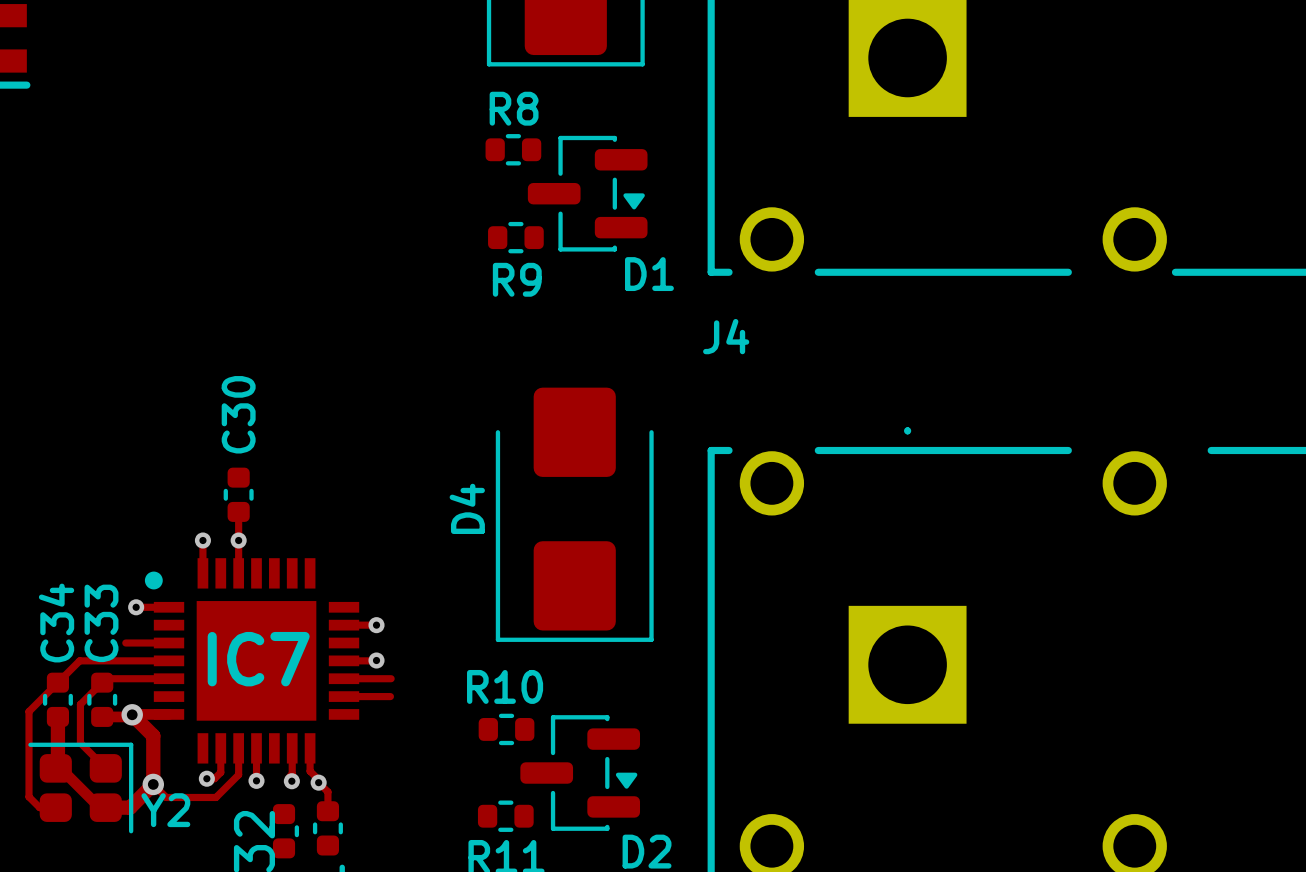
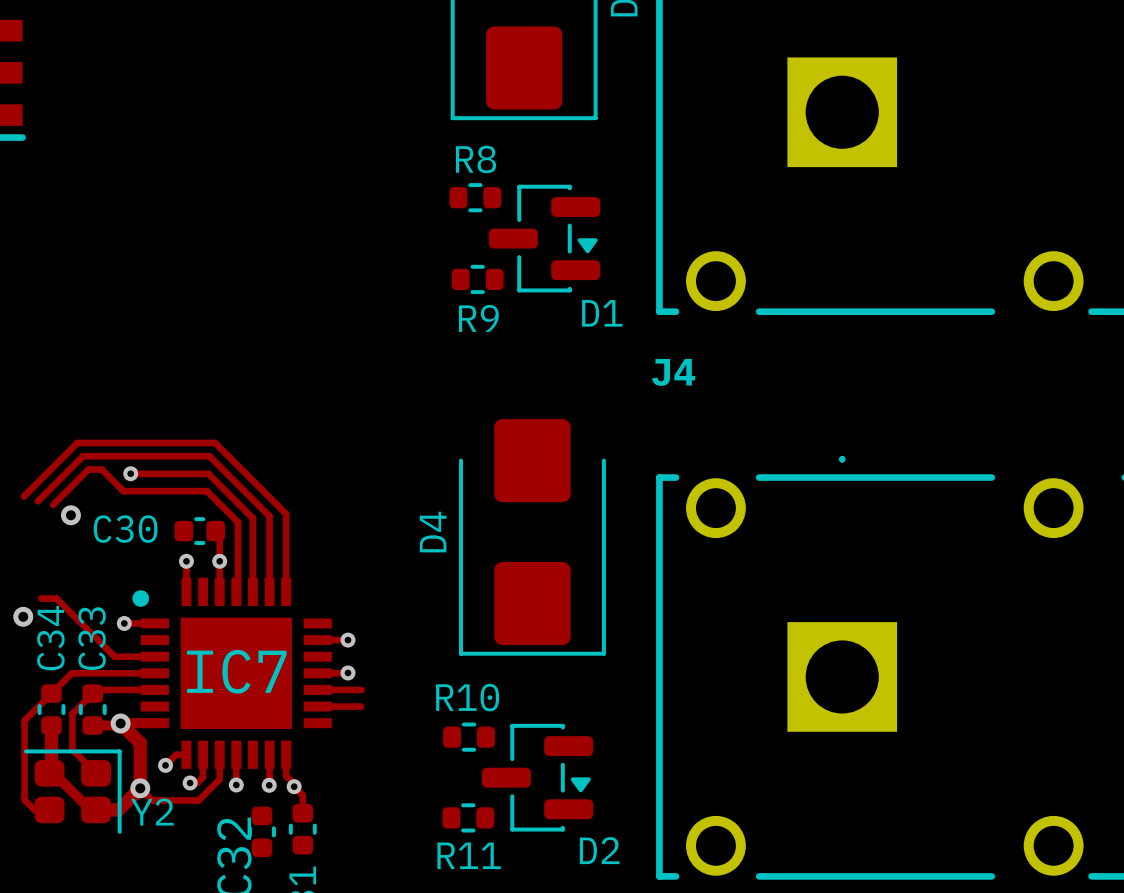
C30 name position: C30 (238, 414) -> C30 (125, 529)
track: none -> (133, 470) (136, 473) (208, 473) (252, 518) (252, 591)
via: none -> (130, 473)
track: none -> (23, 496) (77, 442) (215, 442) (286, 514) (286, 591)
track: none -> (37, 501) (82, 456) (209, 456) (269, 516) (269, 591)
track: none -> (53, 504) (88, 469) (101, 469) (123, 491) (206, 491) (237, 522) (237, 590) (236, 591)
via: none -> (70, 515)
C30 rotation: 0° (238, 494) -> 90° clockwise (199, 531)
track: none -> (41, 598) (56, 598) (114, 656)
via: none -> (23, 616)
track: none -> (186, 754) (176, 754) (165, 765)
via: none -> (165, 765)

